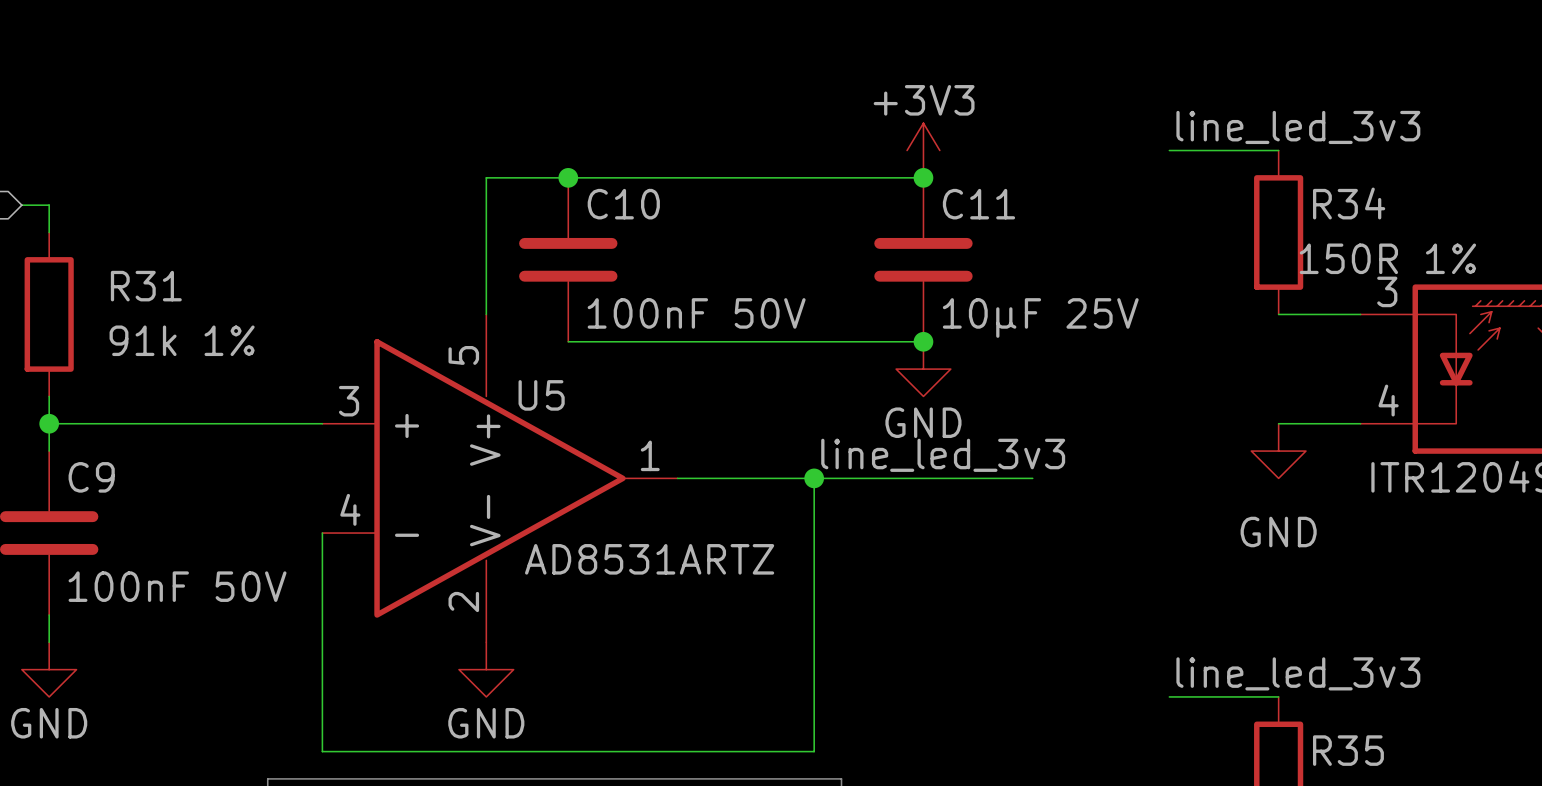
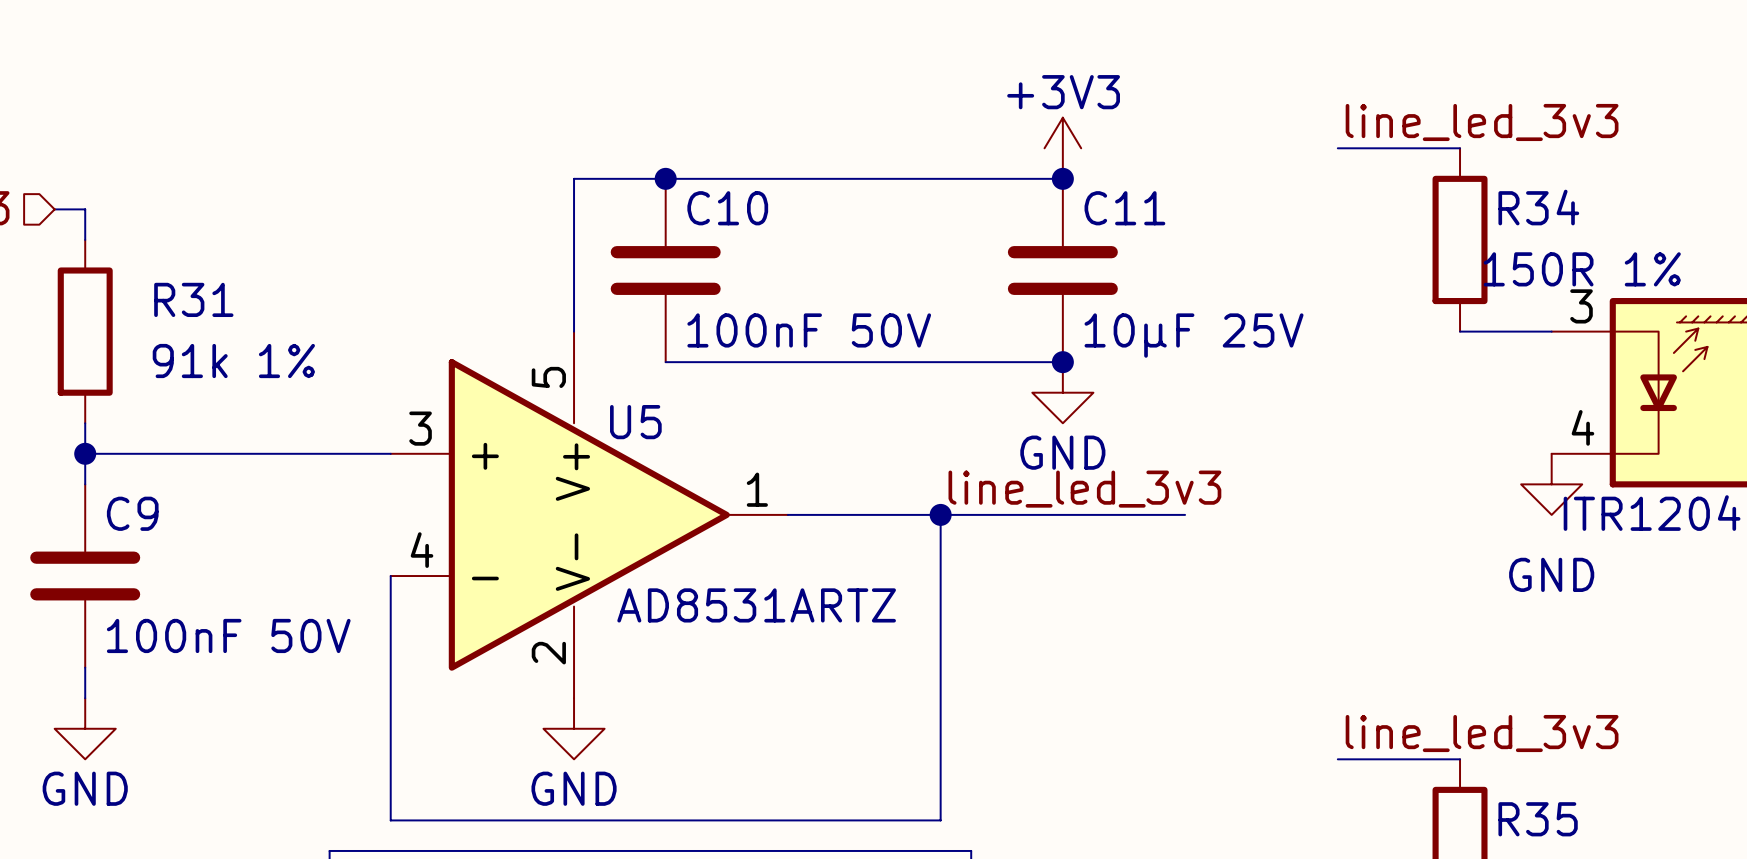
wire: (1278, 423) (1360, 423) -> none
power symbol position: GND (1278, 451) -> GND (1551, 484)

